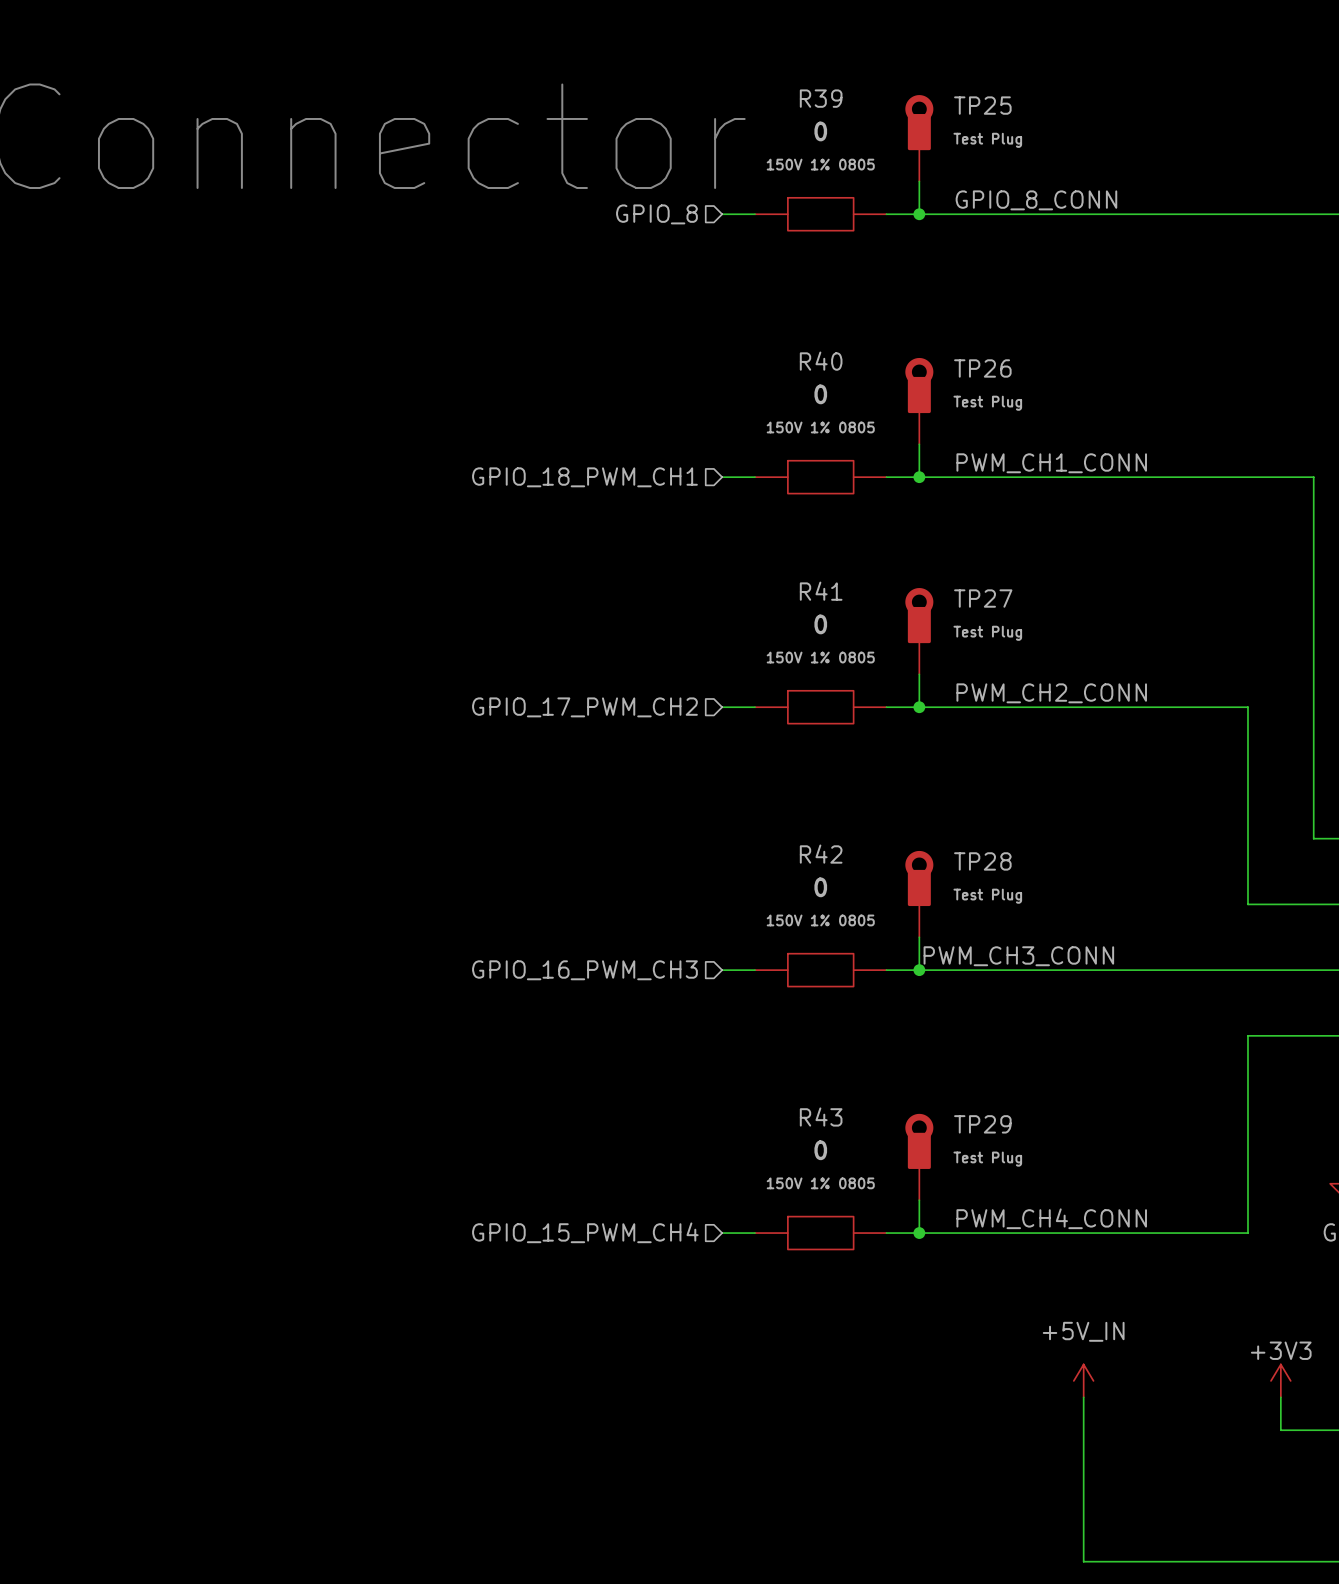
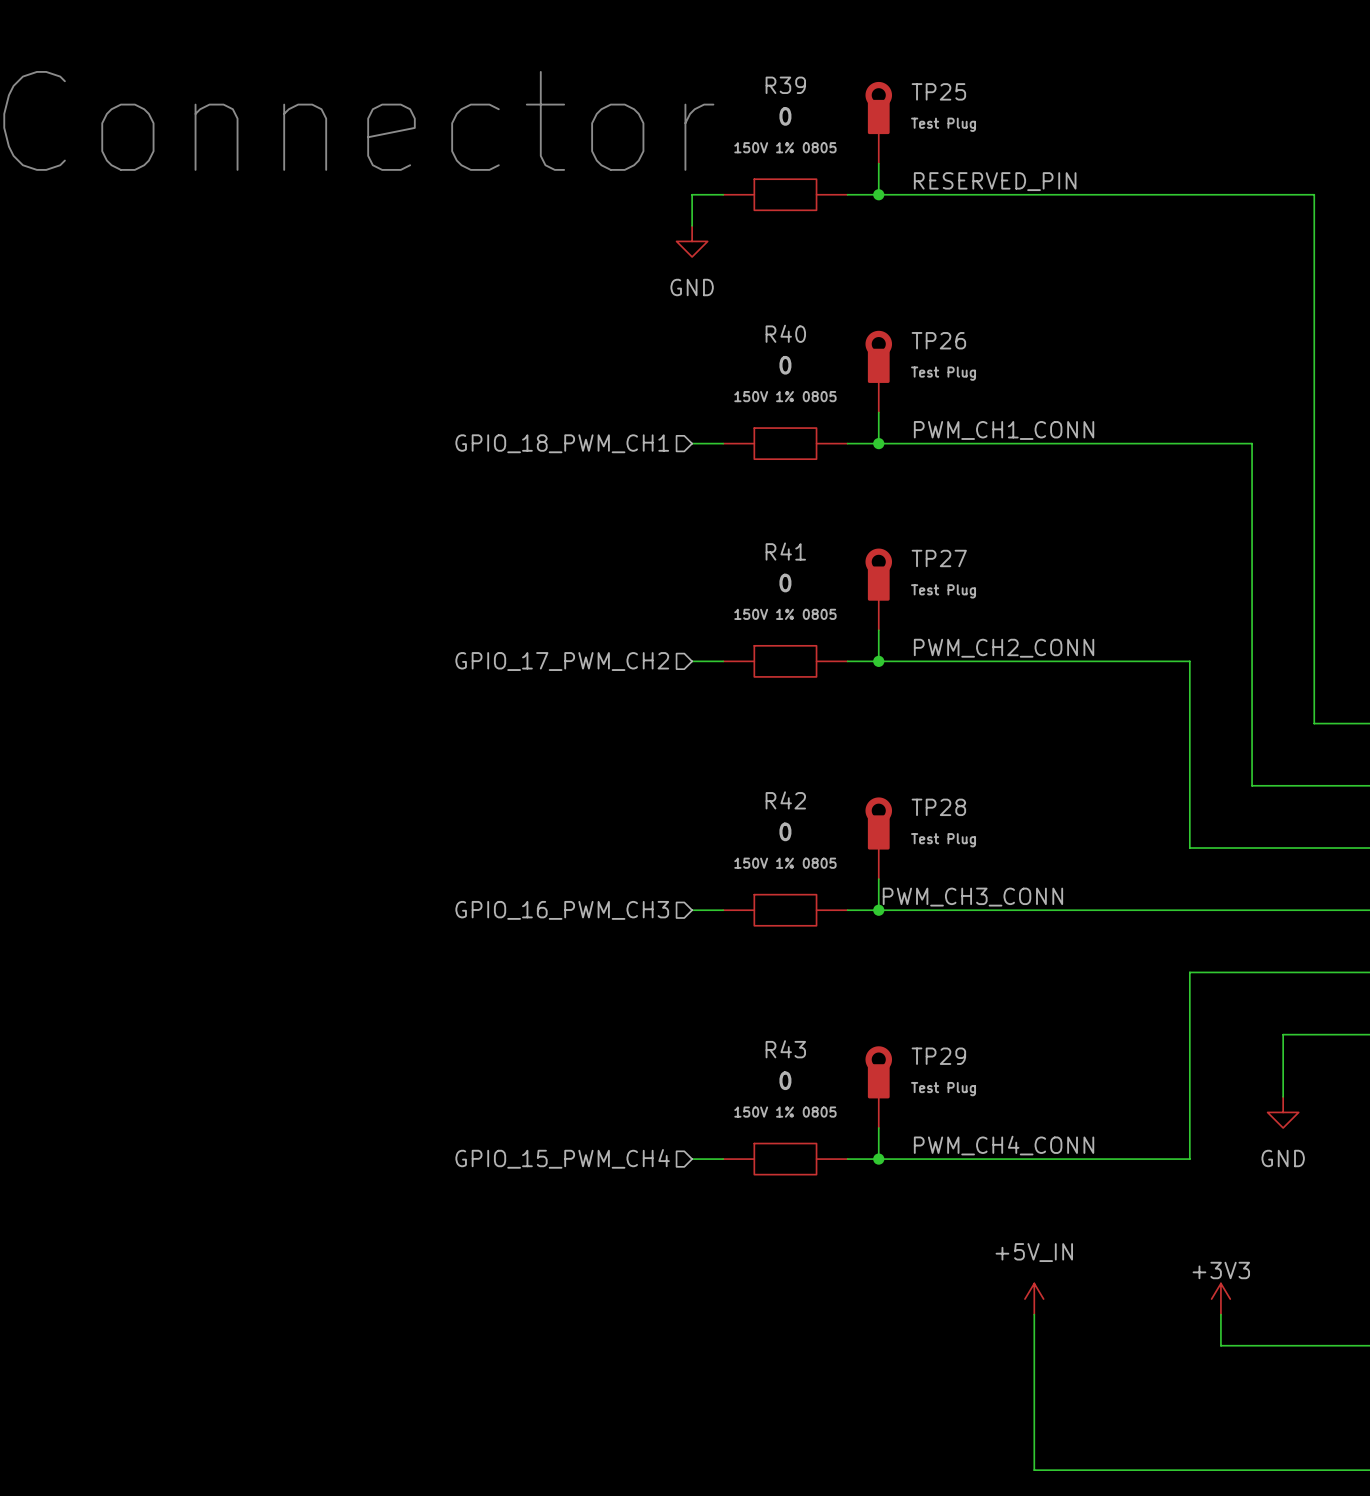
label: GPIO_8_CONN (1036, 200) -> RESERVED_PIN (995, 181)
hierarchical label: GPIO_8 (656, 214) -> none
wire: none -> (692, 194) (692, 225)
power symbol: none -> GND (692, 241)

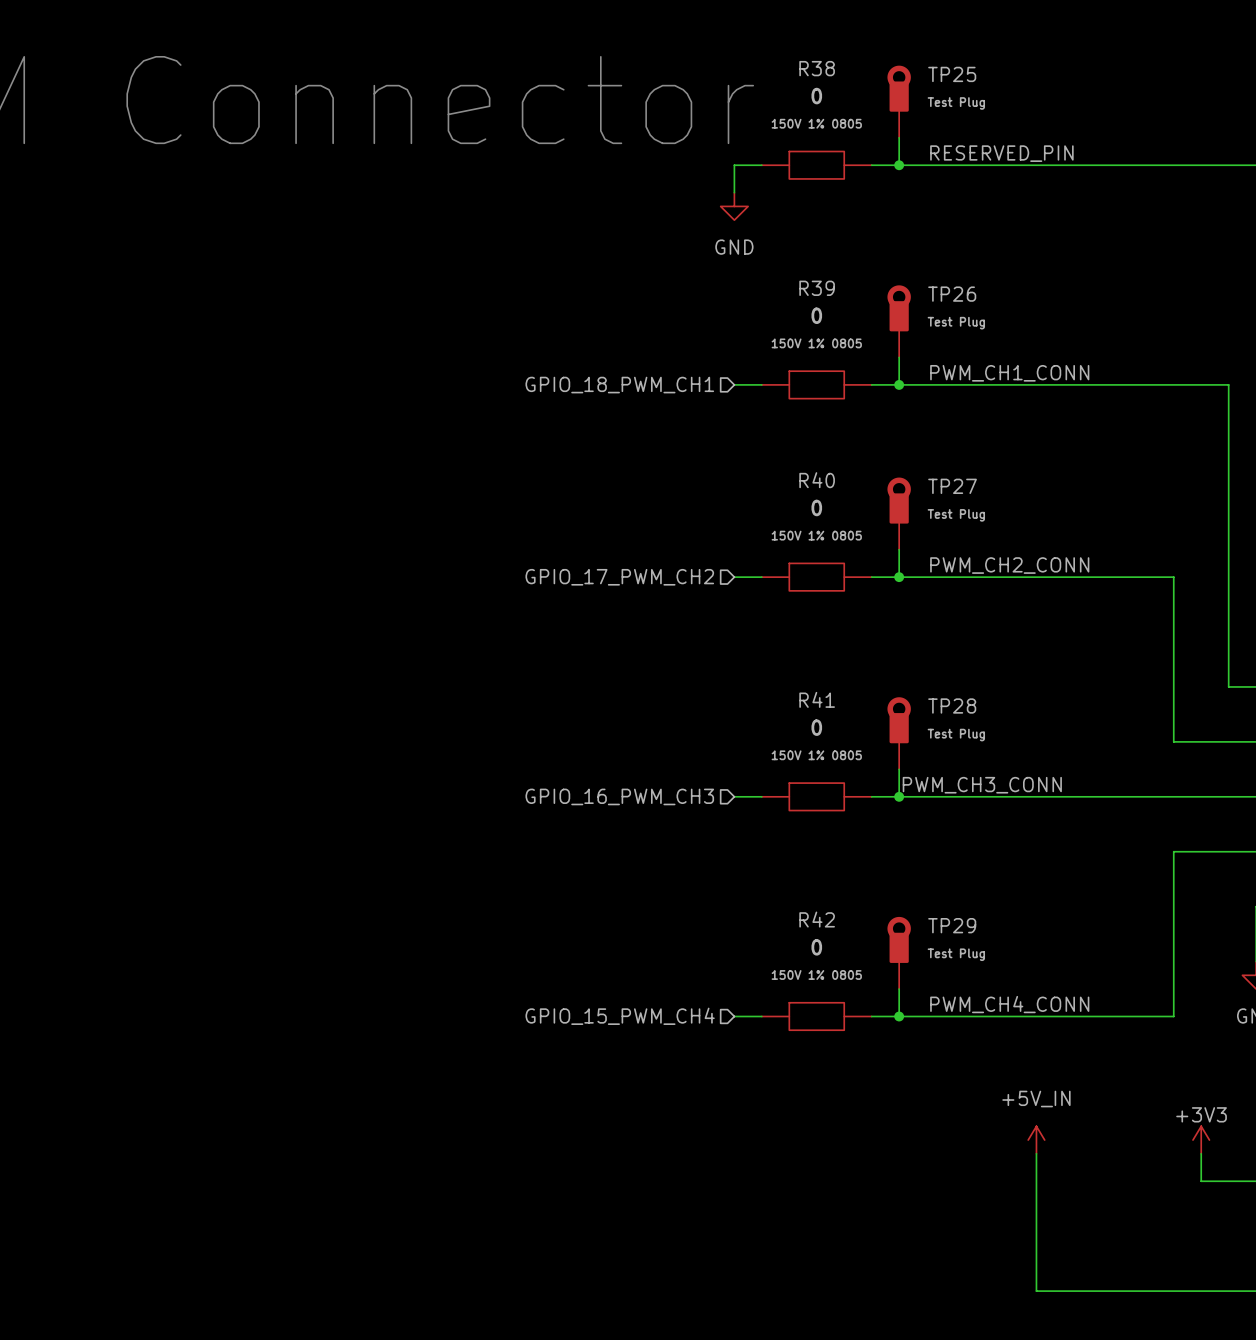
R39 name: R39 (785, 85) -> R38 (817, 68)
R40 name: R40 (785, 333) -> R39 (817, 288)
R41 name: R41 (785, 551) -> R40 (817, 480)
R42 name: R42 (785, 800) -> R41 (817, 699)
R43 name: R43 (785, 1049) -> R42 (817, 919)

